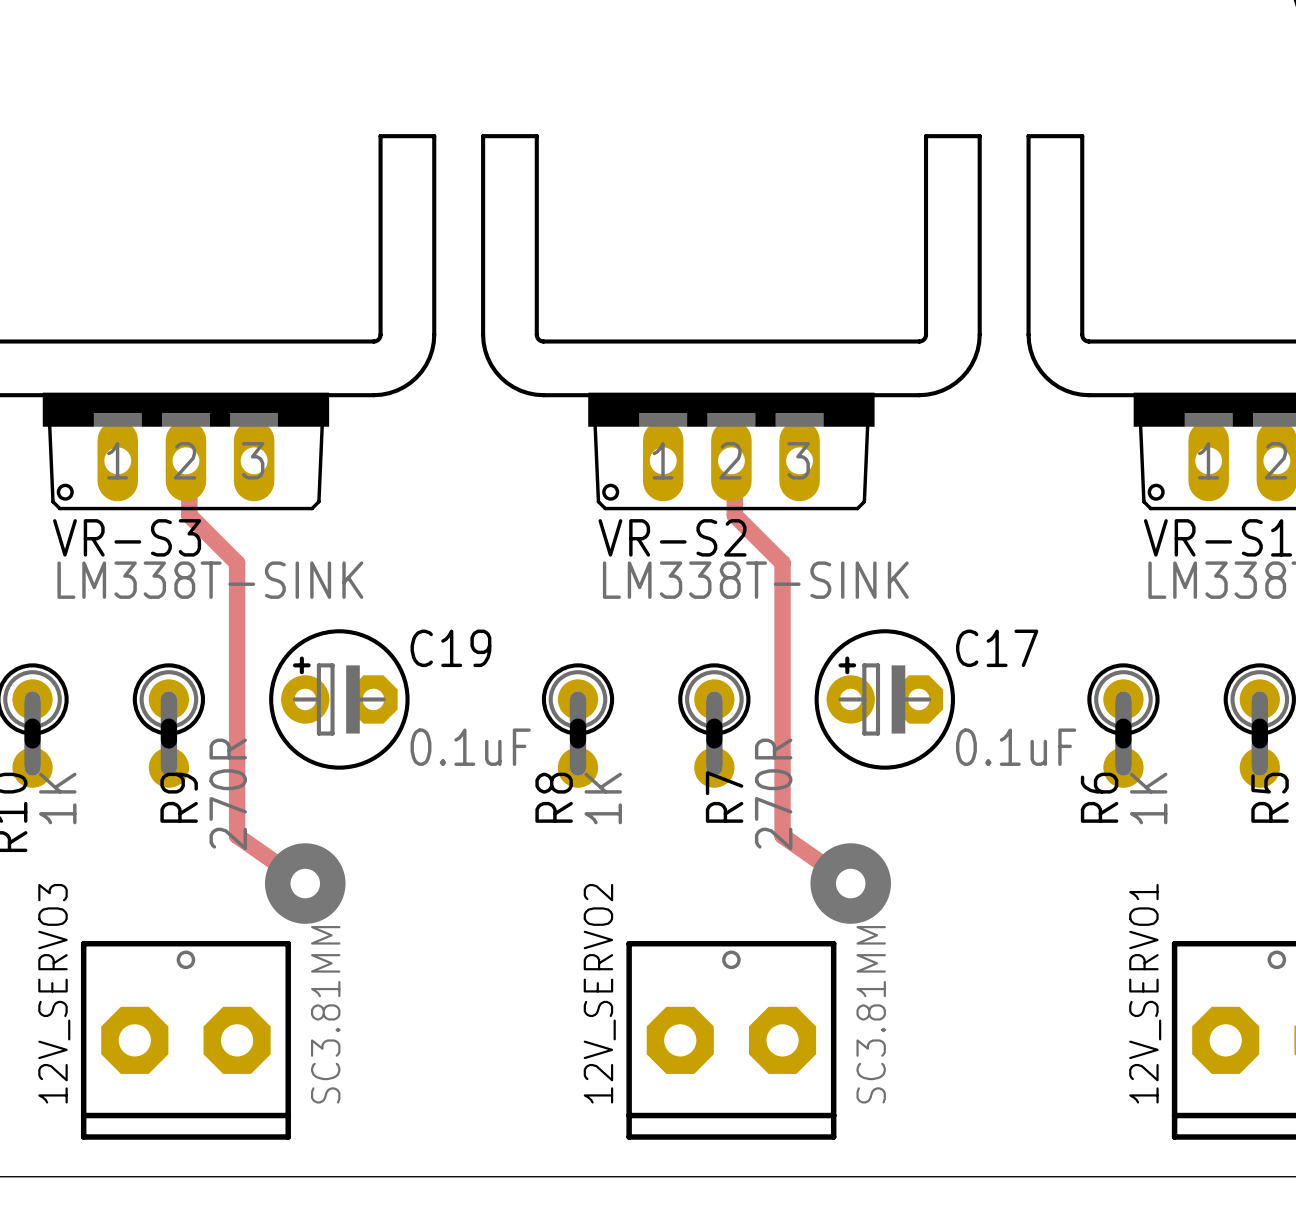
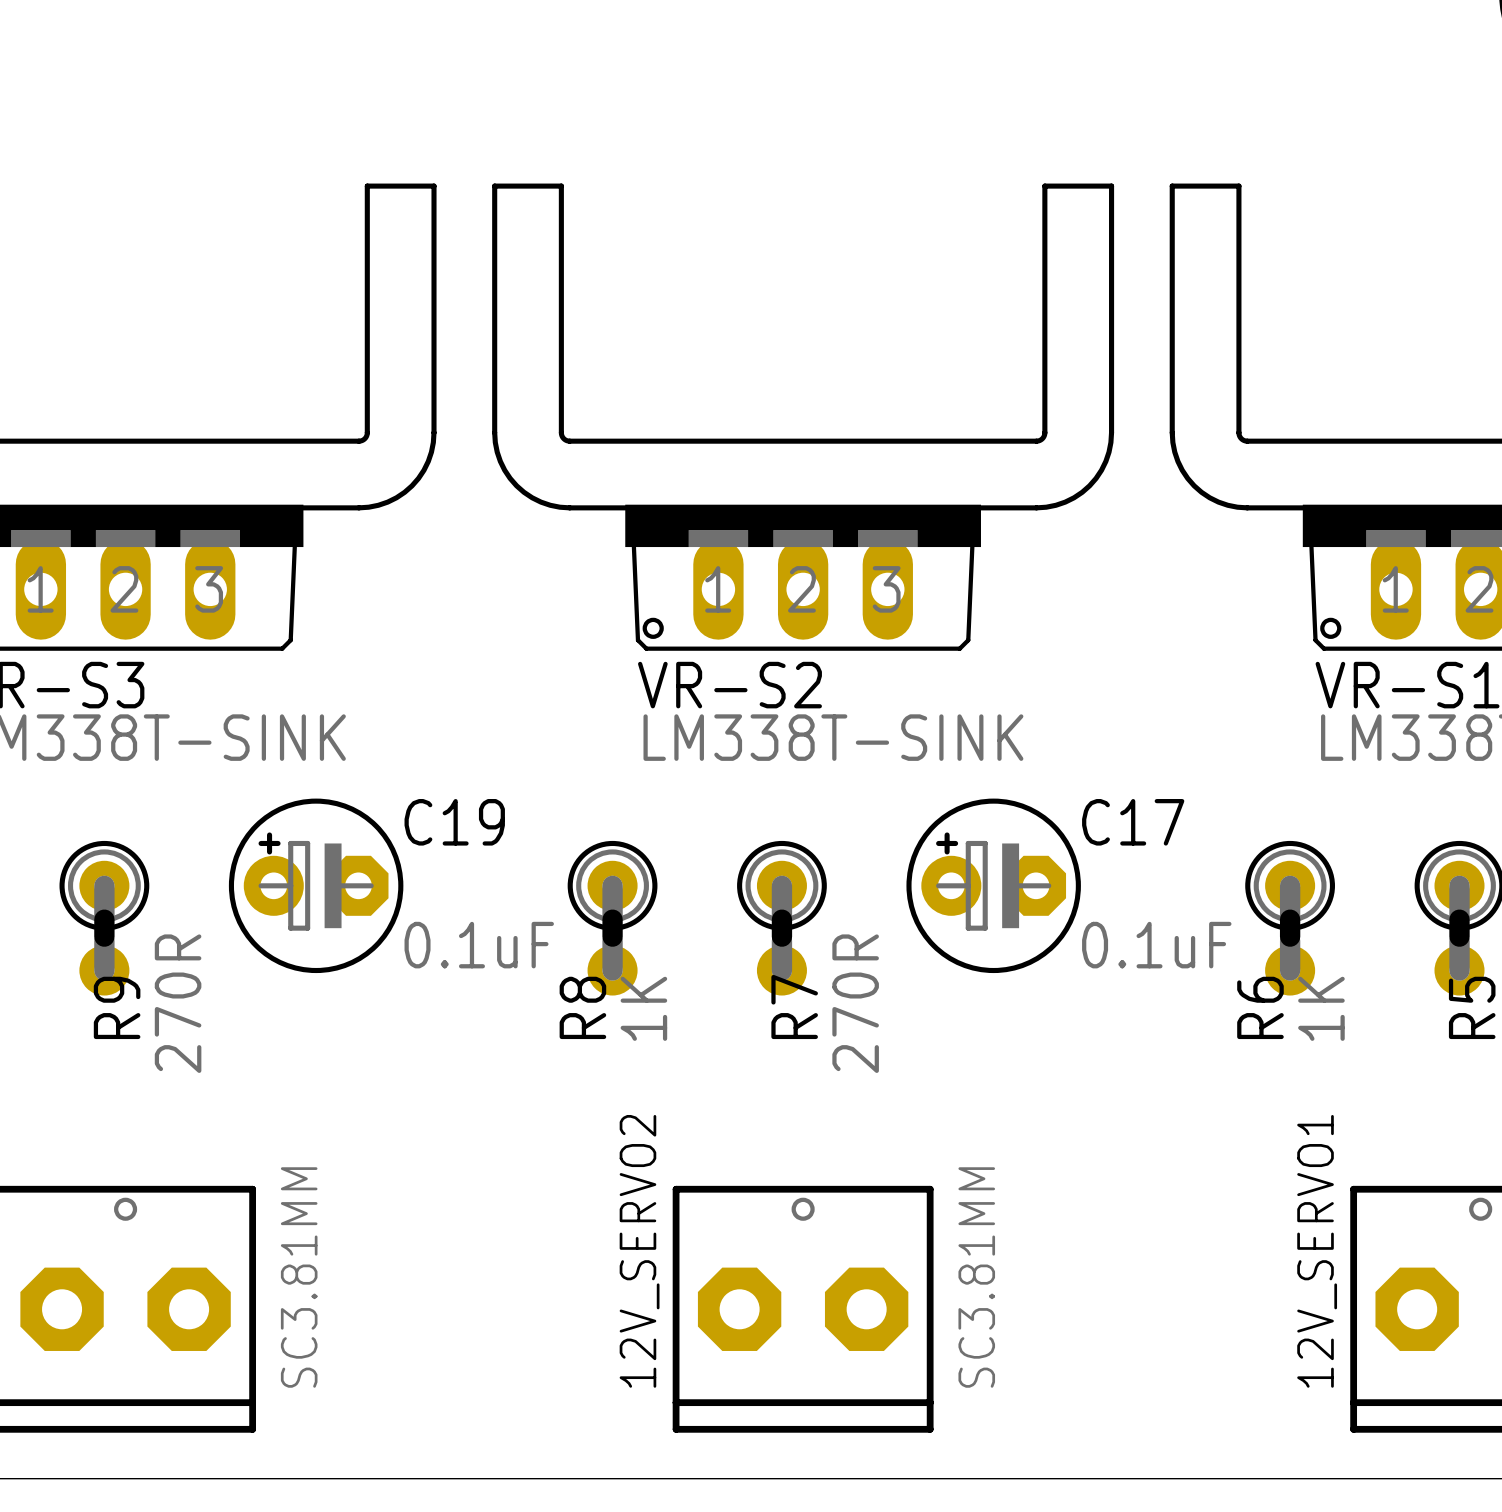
track: (185, 460) (189, 515) (237, 563) (237, 835) (305, 883) -> none
track: (731, 460) (734, 460) (734, 515) (782, 563) (782, 835) (850, 883) -> none
via: (305, 883) -> none
via: (850, 883) -> none

